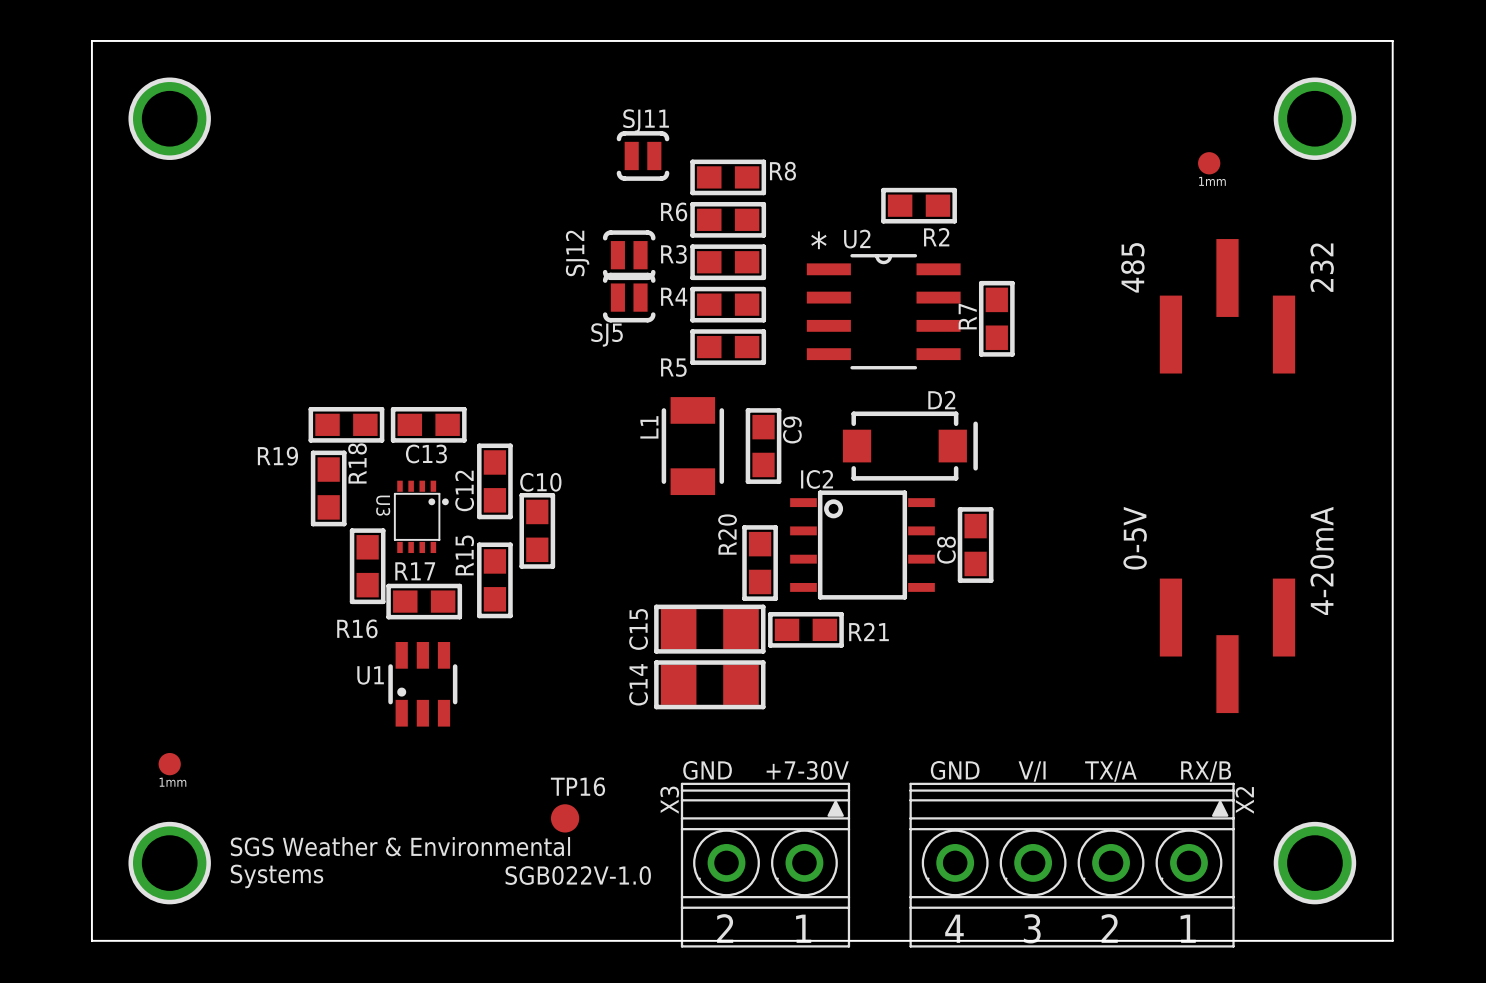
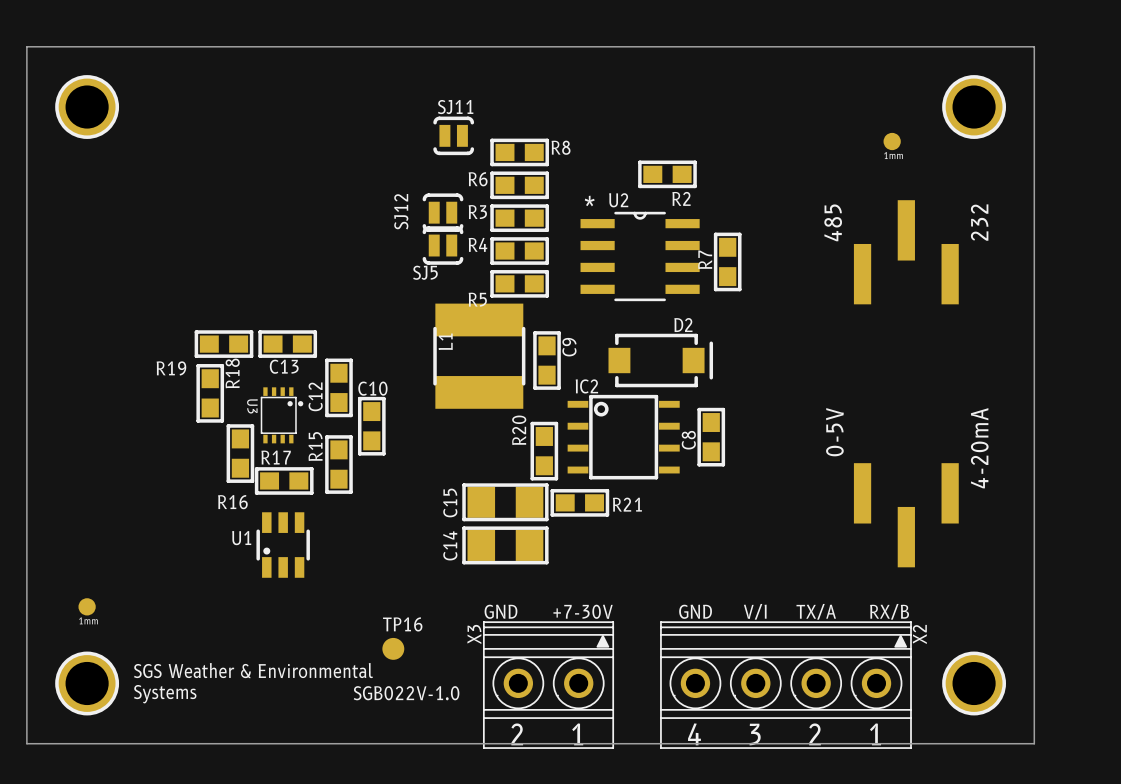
L1 footprint: [661, 397, 725, 496] -> [433, 303, 526, 409]

